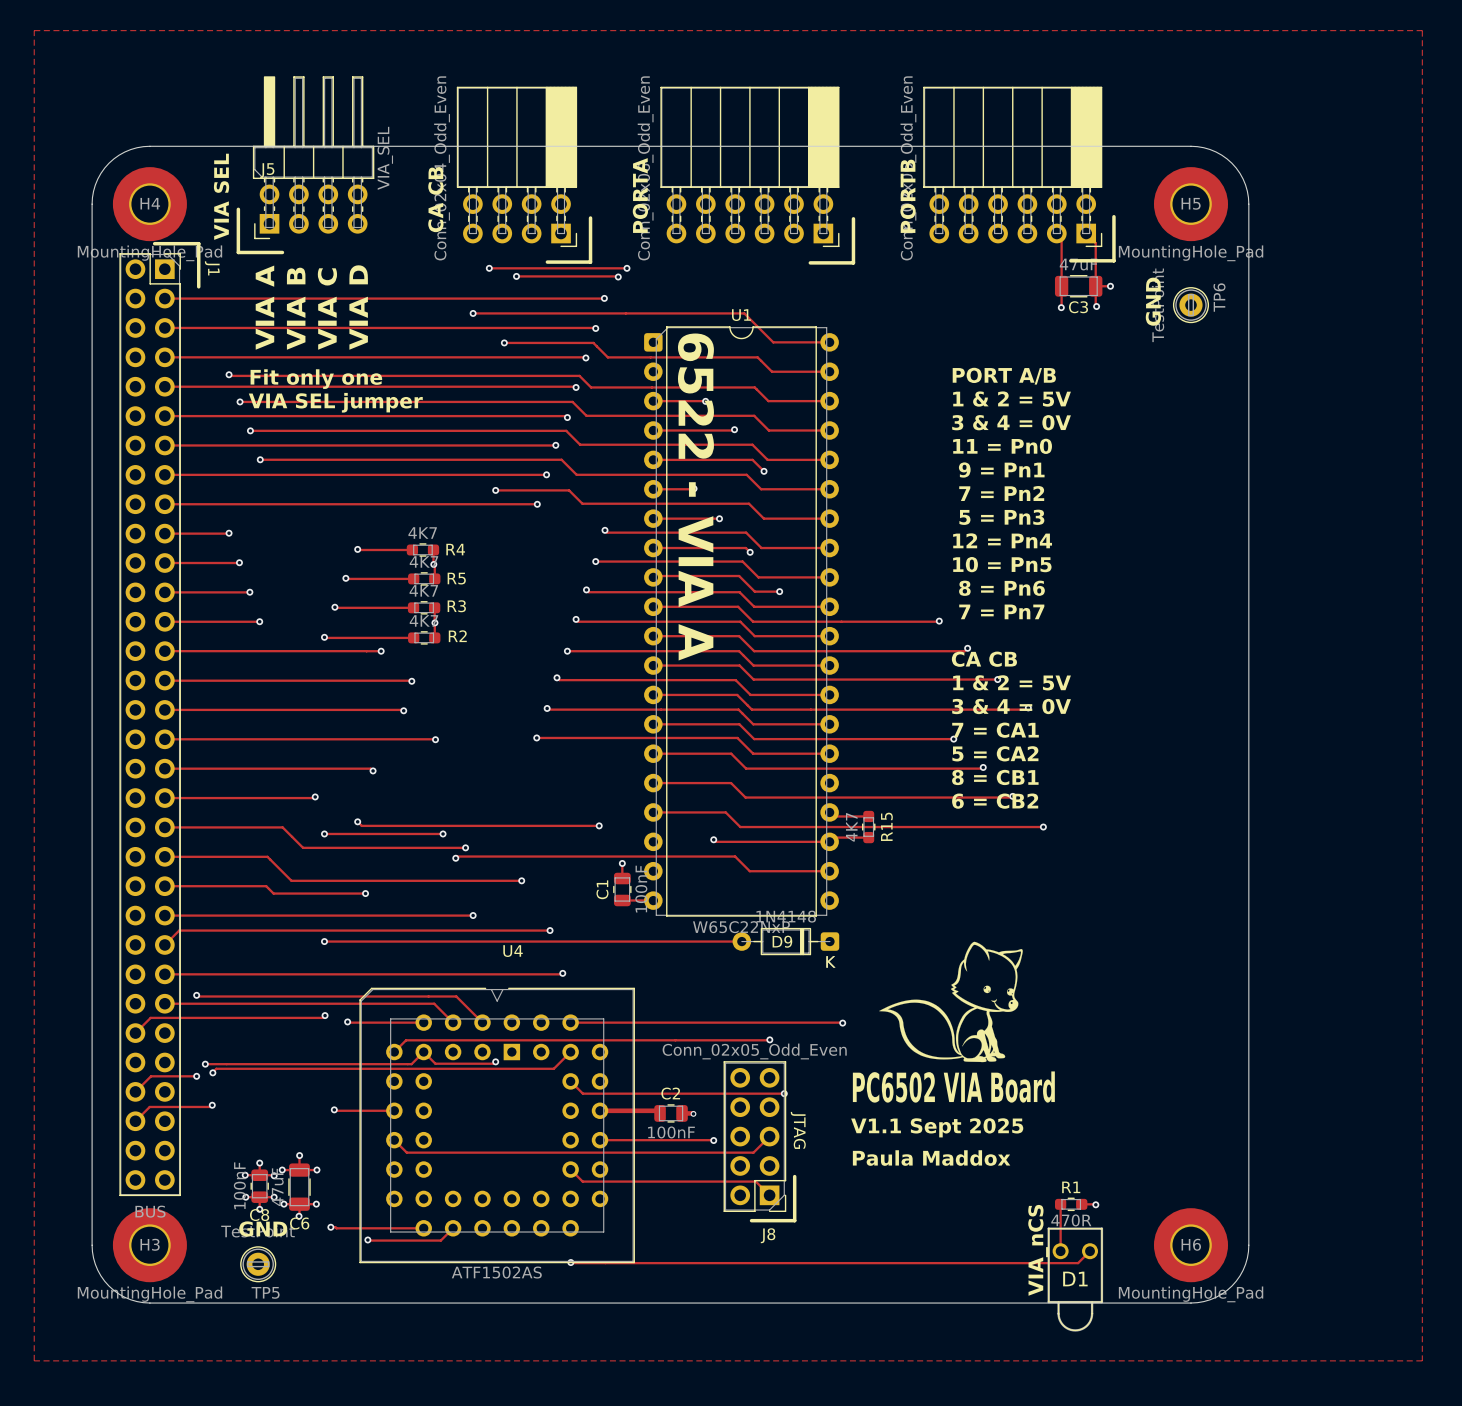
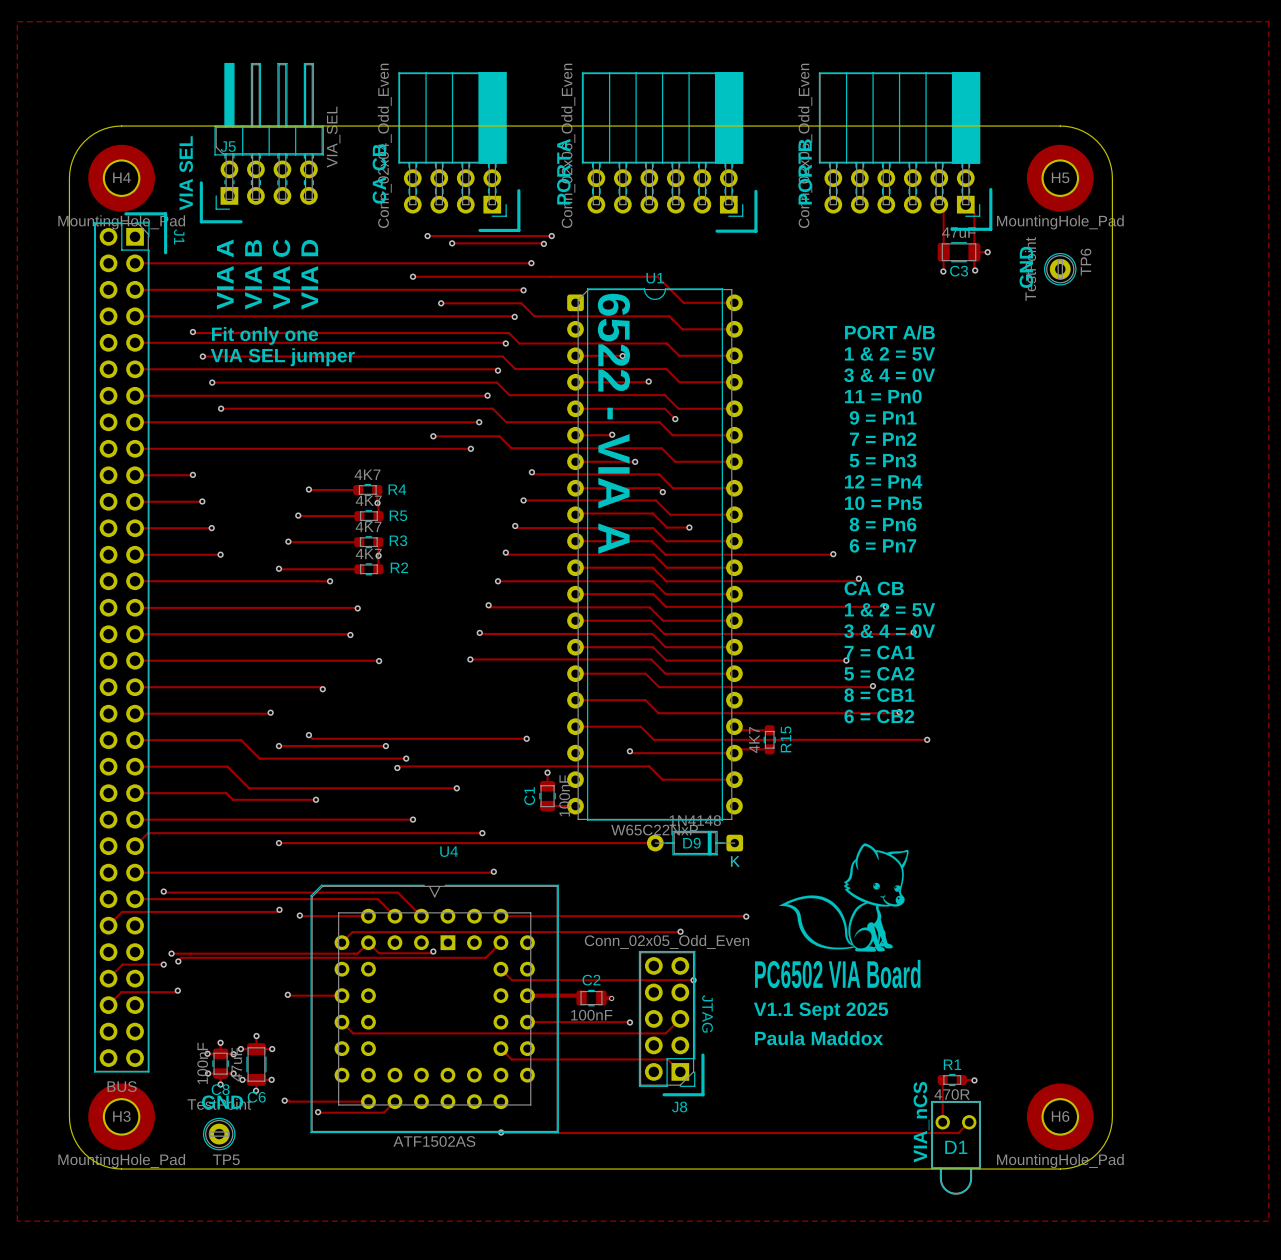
text: 7 = Pn7 (1001, 611) -> 6 = Pn7 (883, 545)

